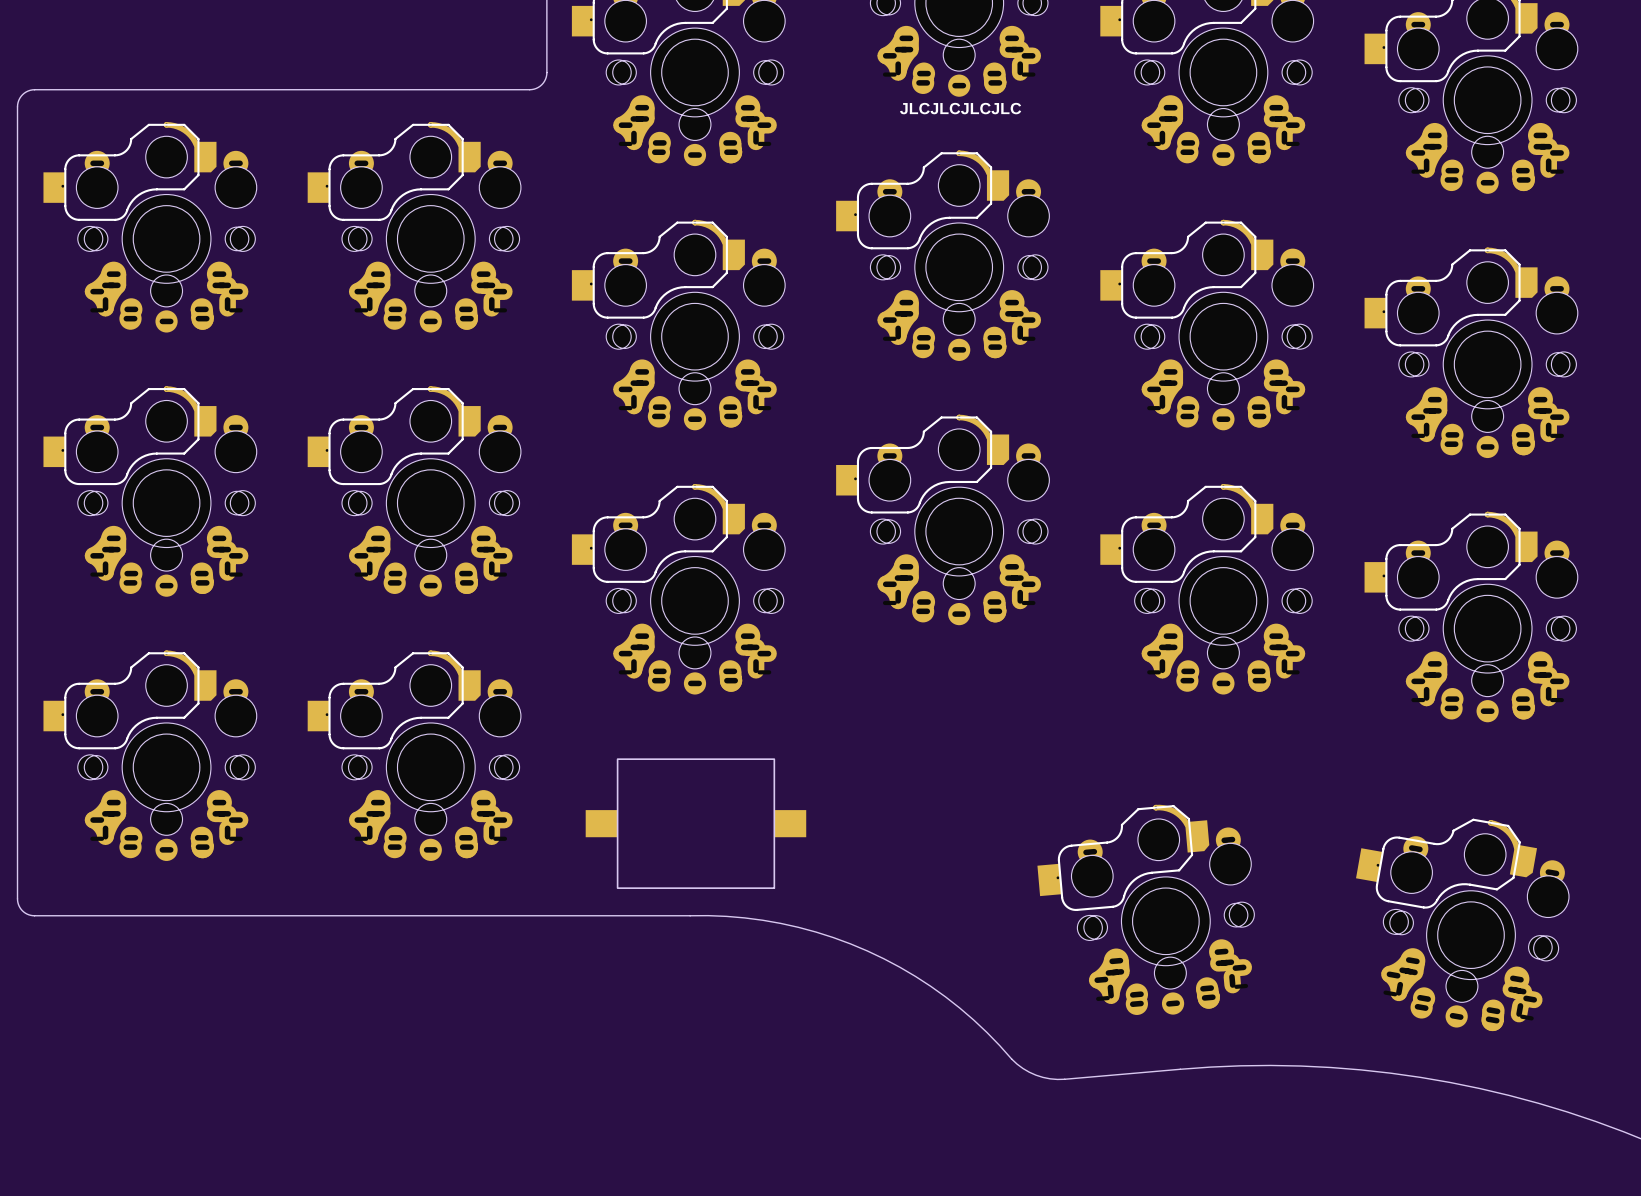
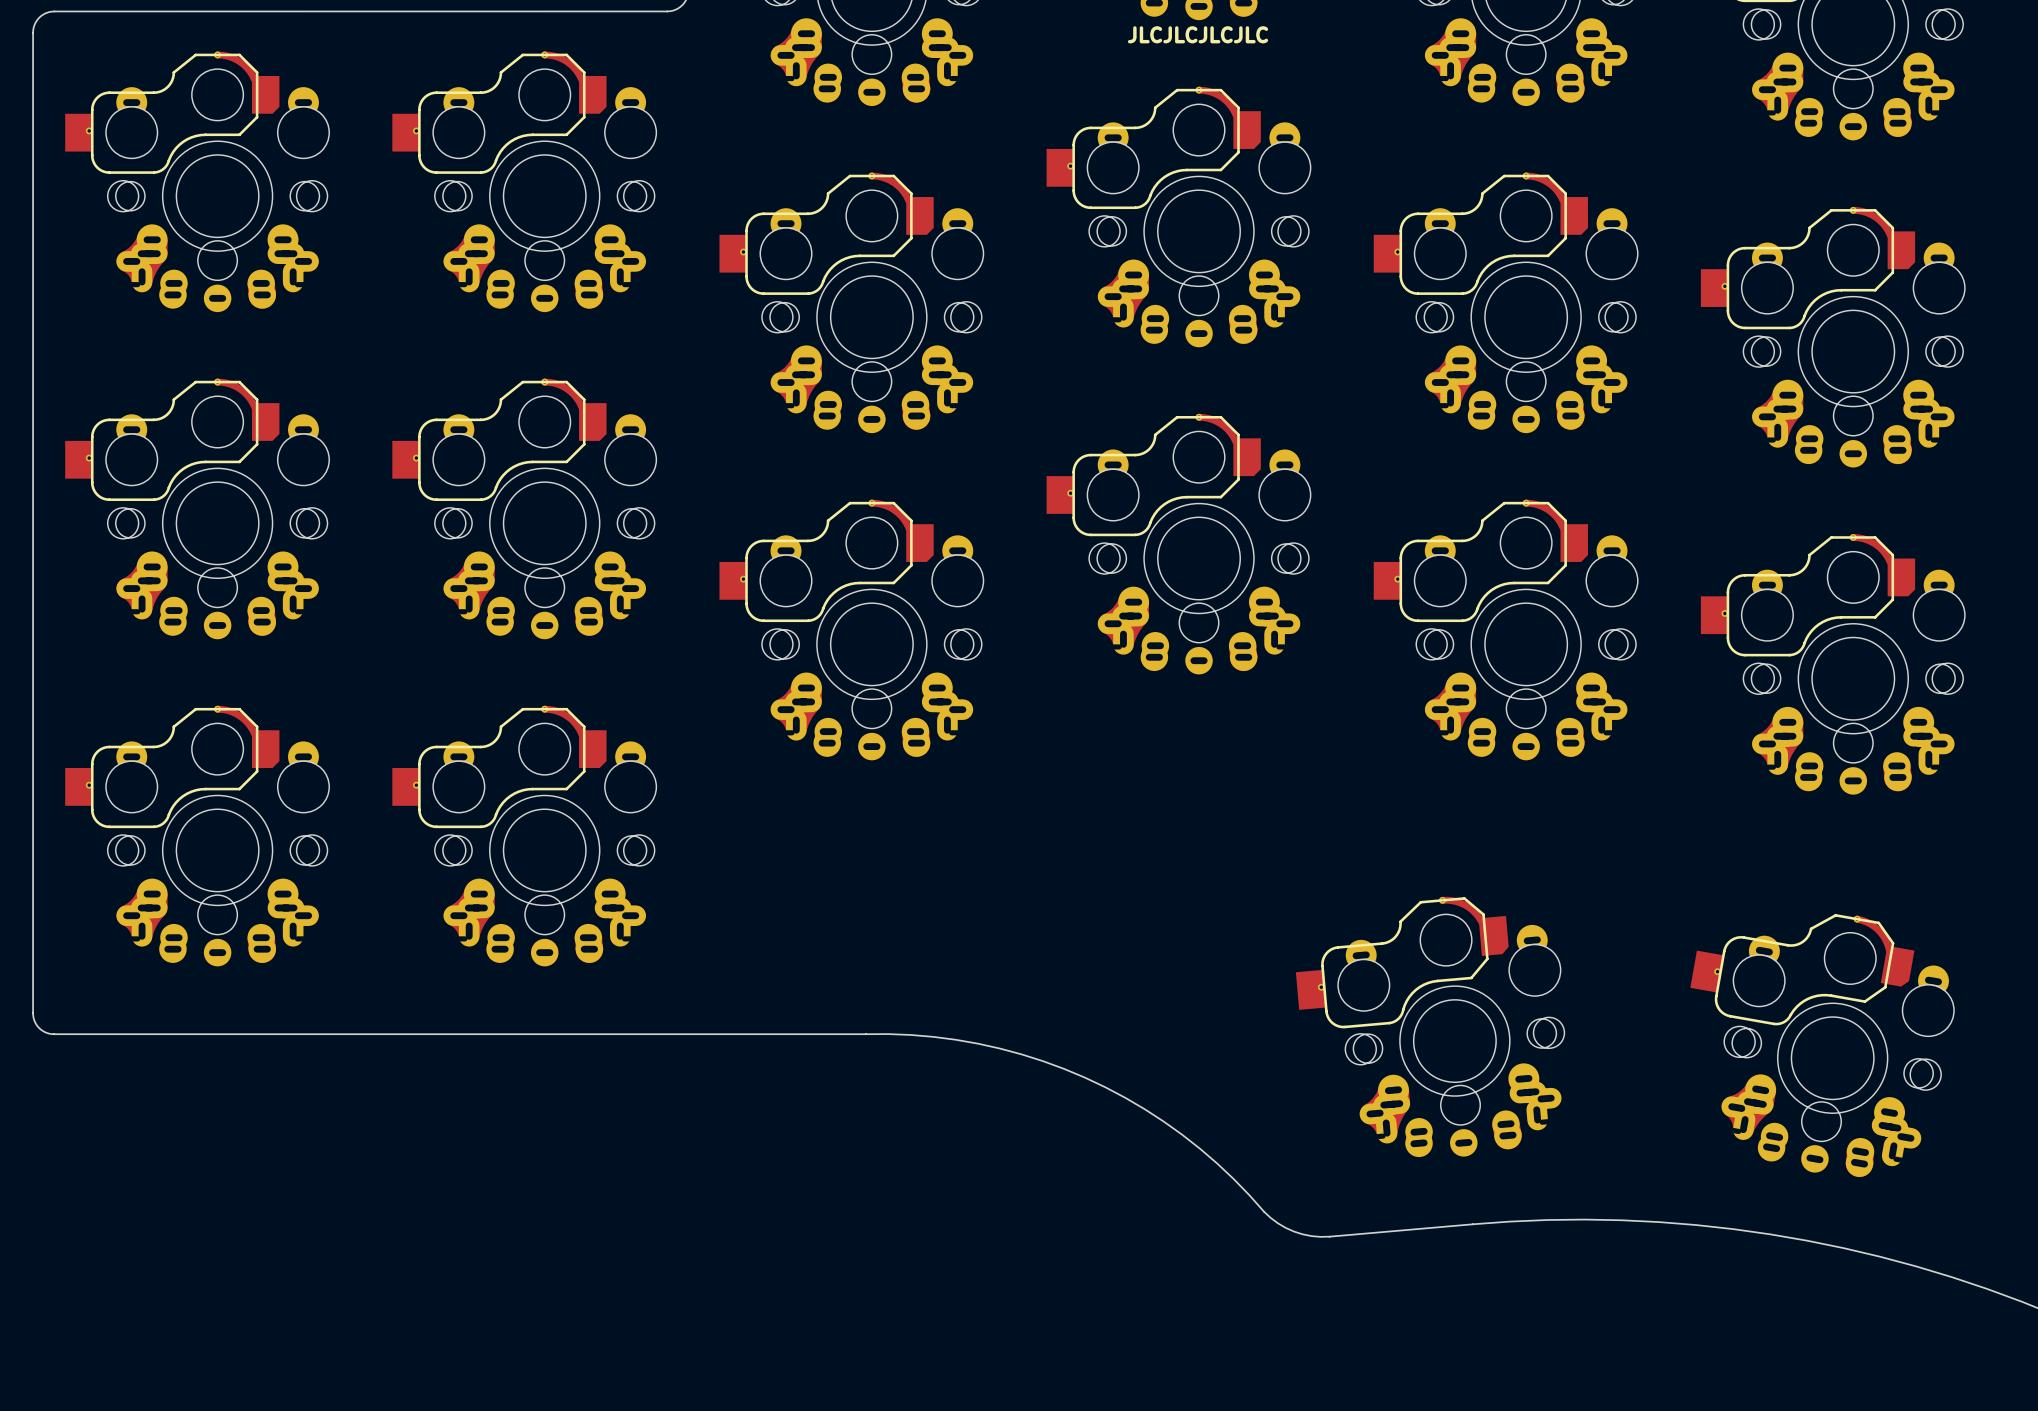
part: (695, 823) -> none

